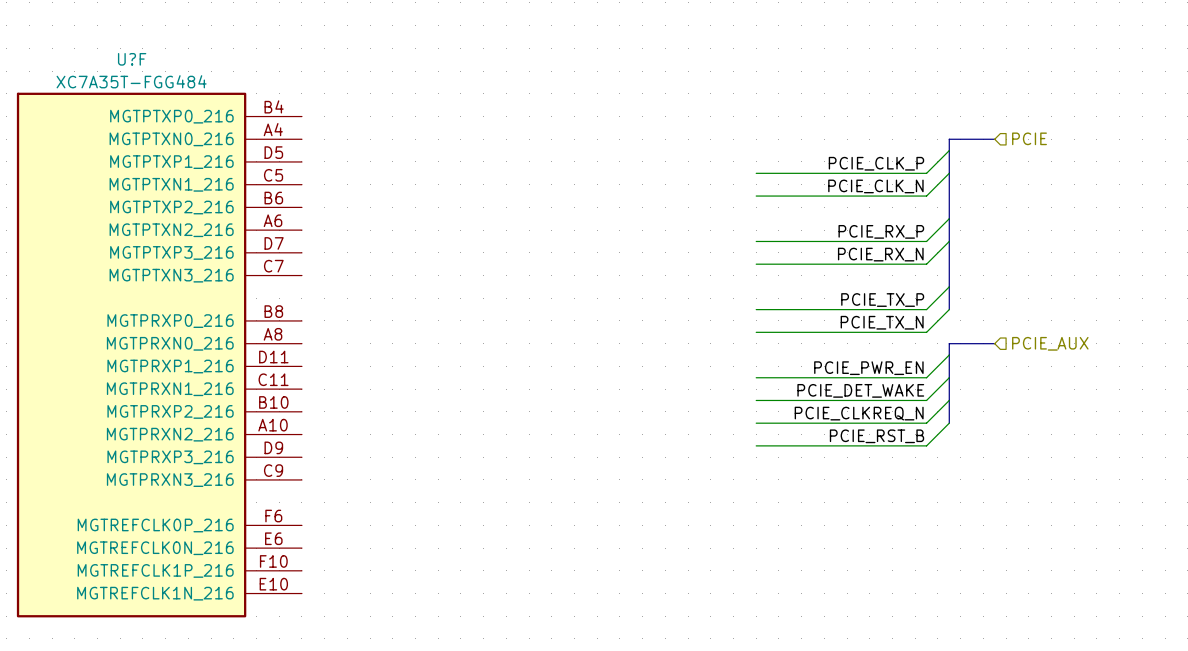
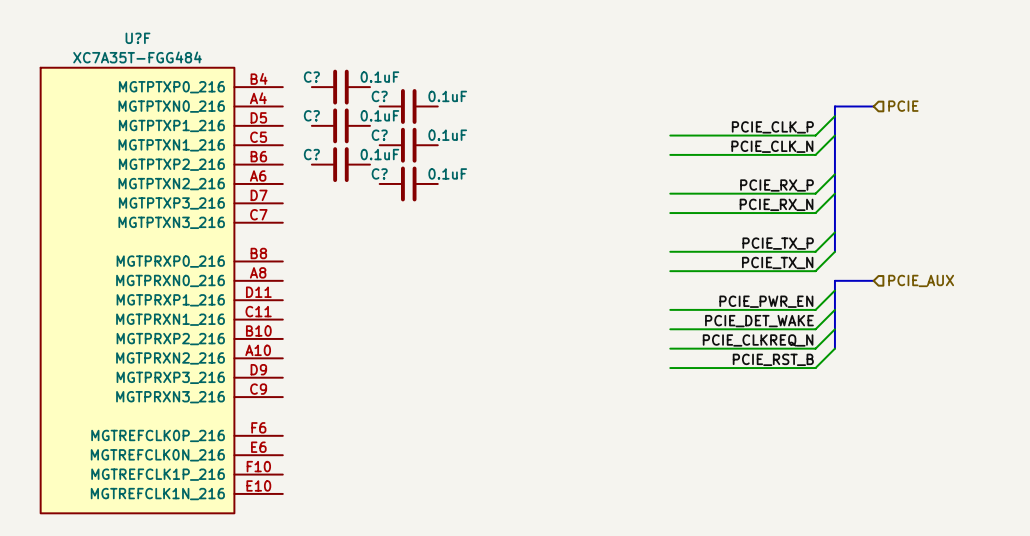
C?: none -> 0.1uF (340, 87)
C?: none -> 0.1uF (408, 106)
C?: none -> 0.1uF (340, 125)
C?: none -> 0.1uF (408, 145)
C?: none -> 0.1uF (340, 164)
C?: none -> 0.1uF (408, 183)

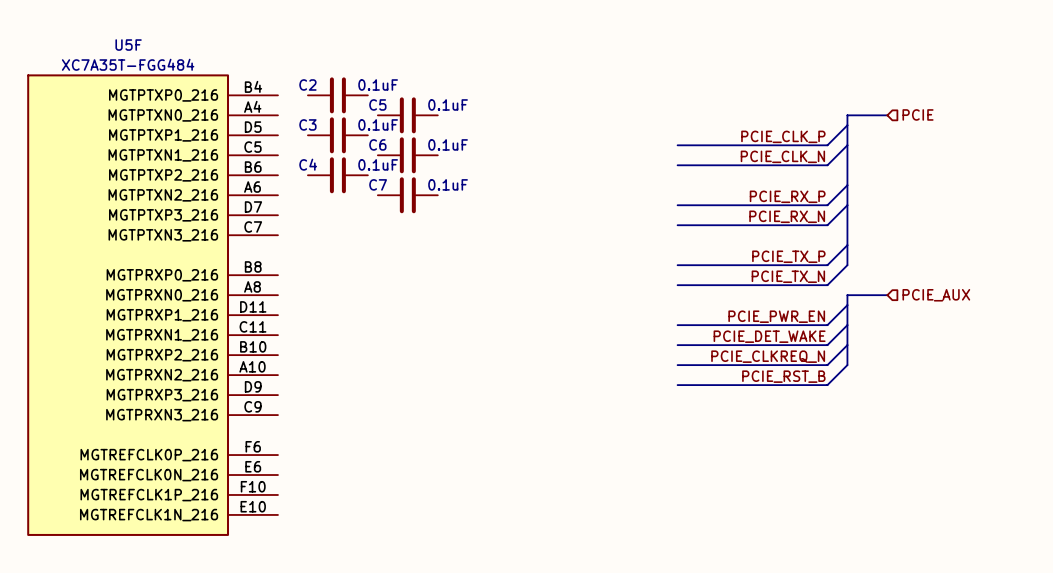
U?F name: U?F (137, 38) -> U5F (128, 45)
C? name: C? (311, 77) -> C2 (307, 84)
C? name: C? (379, 96) -> C5 (377, 104)
C? name: C? (311, 115) -> C3 (307, 124)
C? name: C? (379, 135) -> C6 (377, 144)
C? name: C? (311, 154) -> C4 (308, 164)
C? name: C? (379, 173) -> C7 (378, 184)

